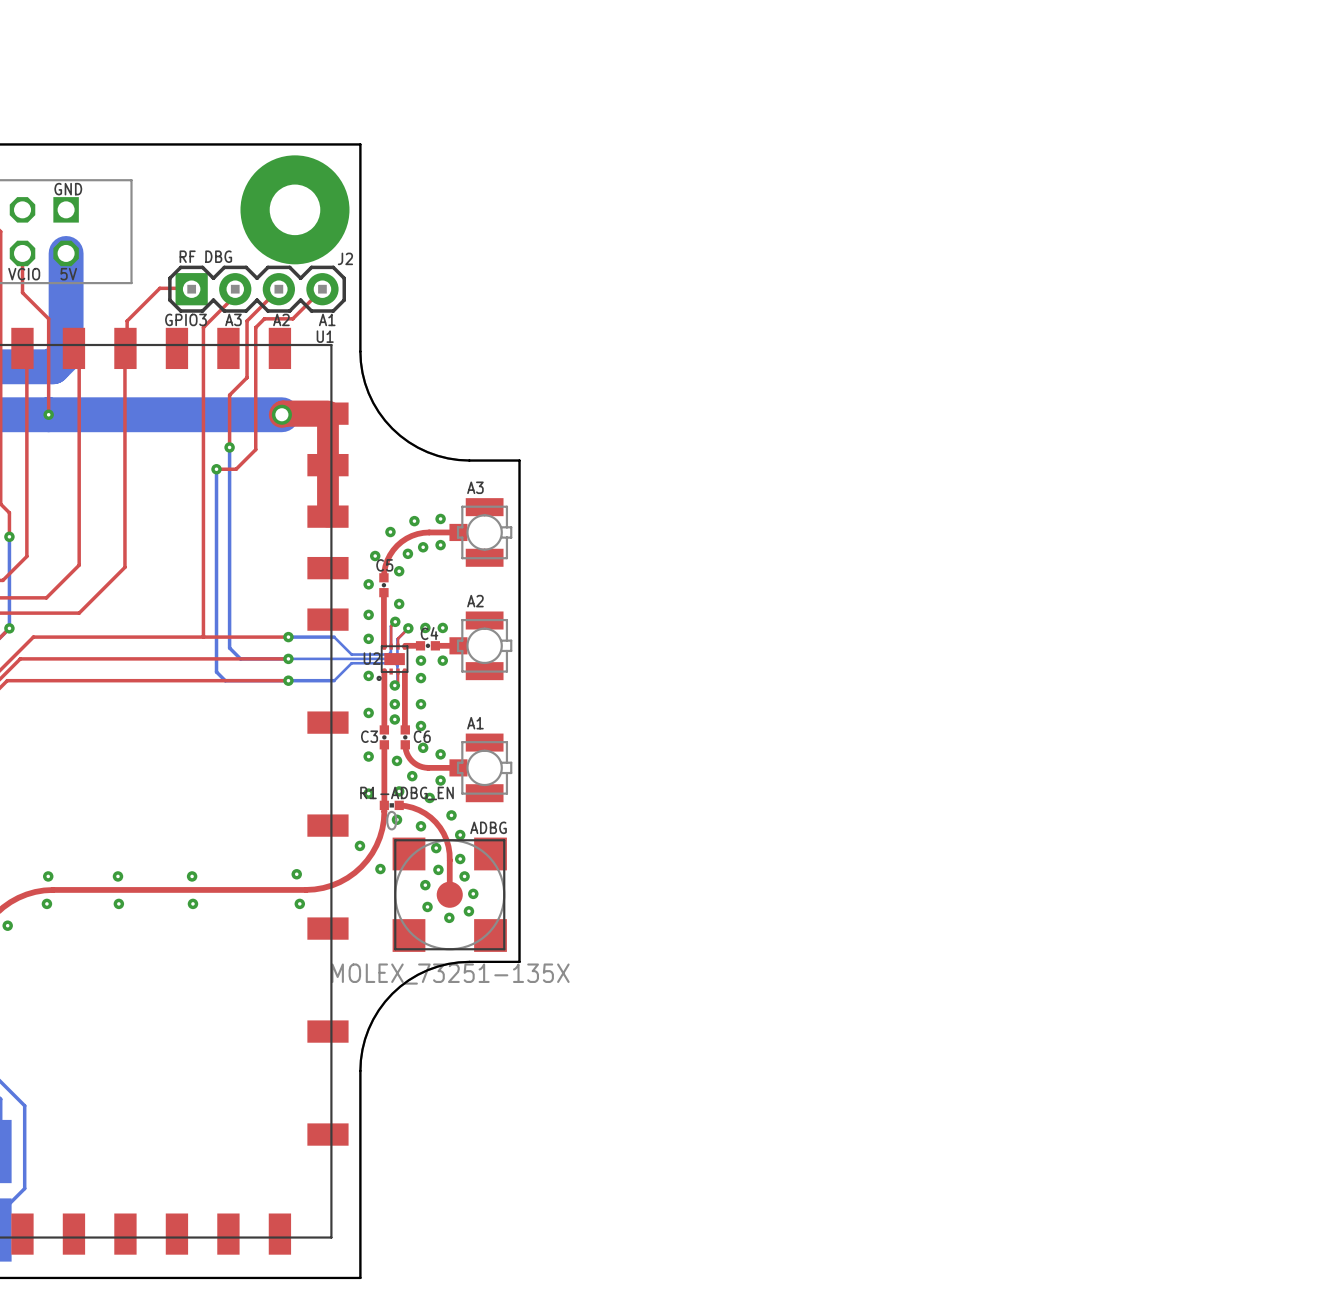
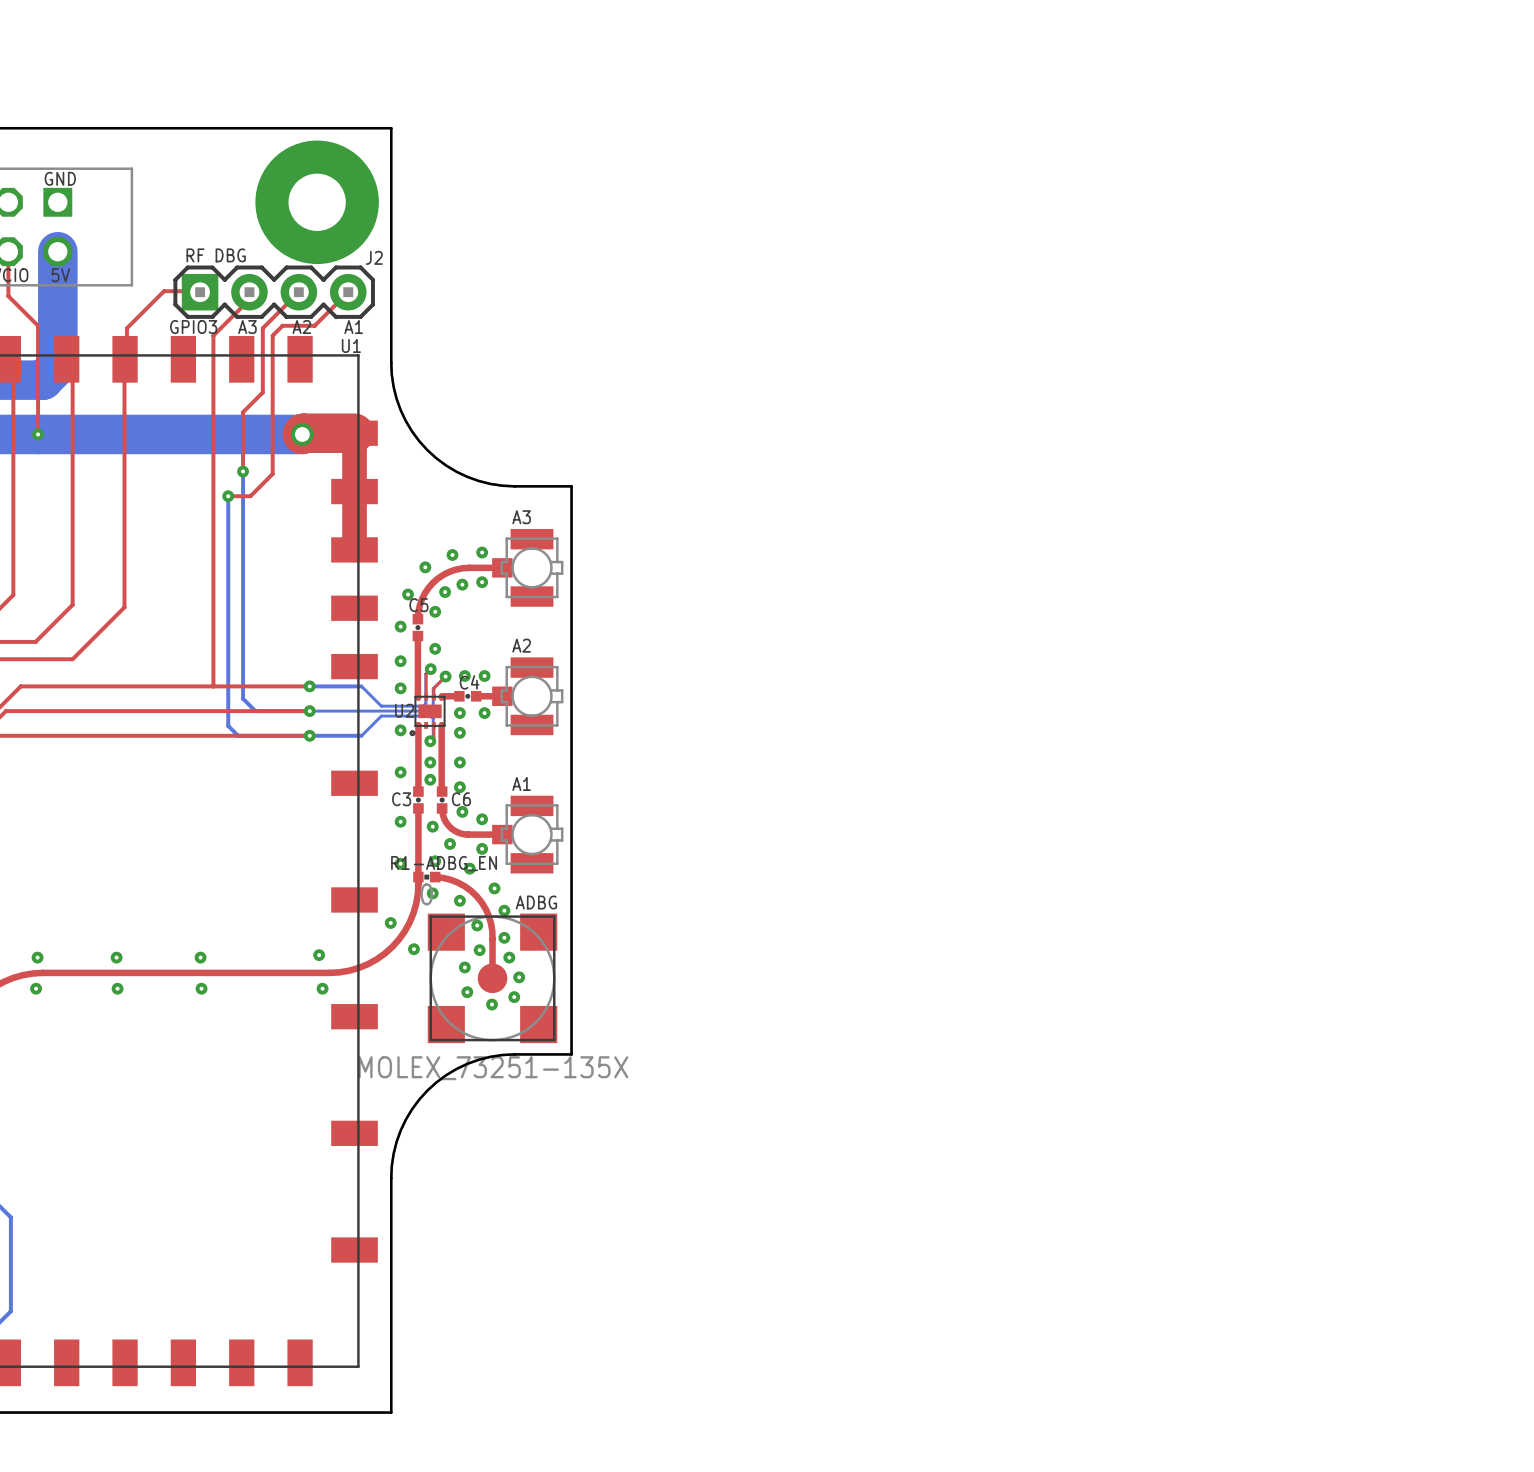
top track width: thin (327, 413) (281, 414) -> thick (354, 433) (302, 434)

